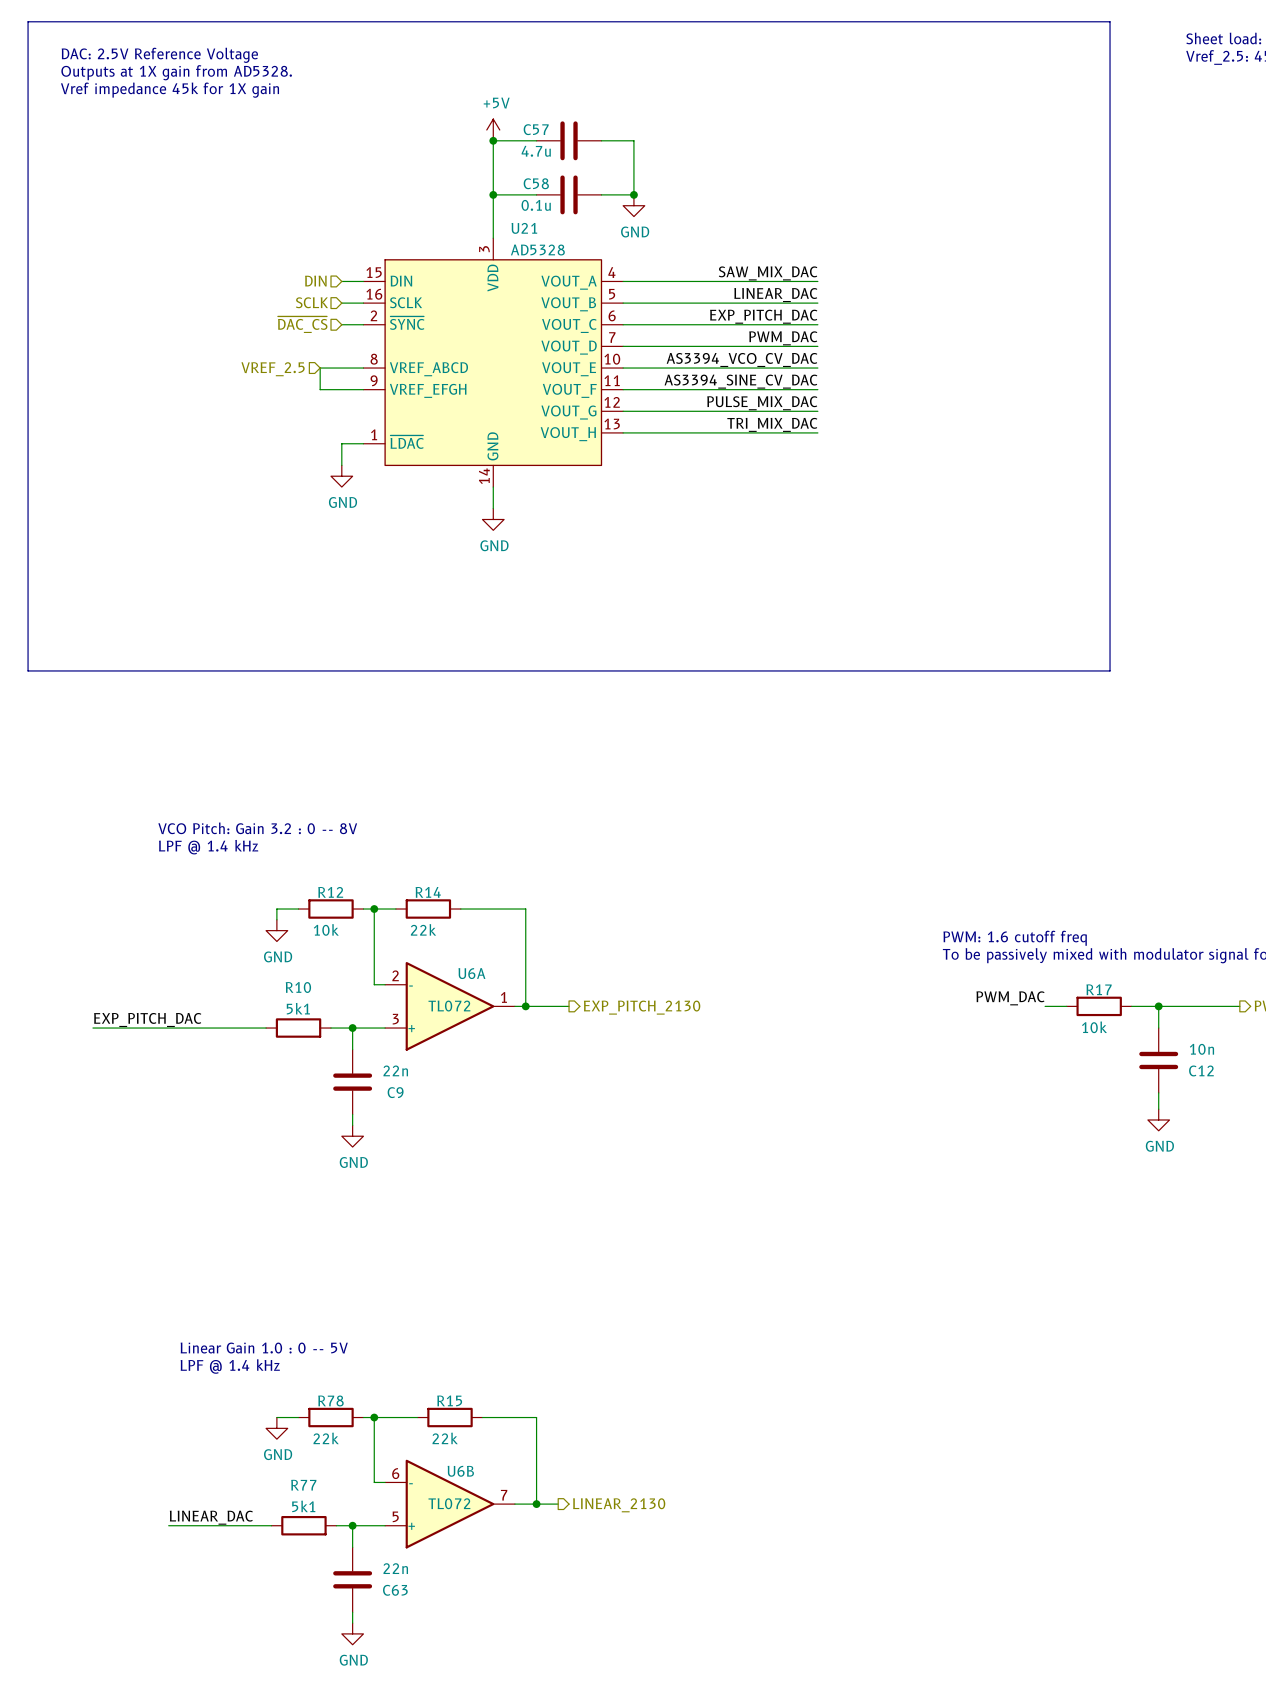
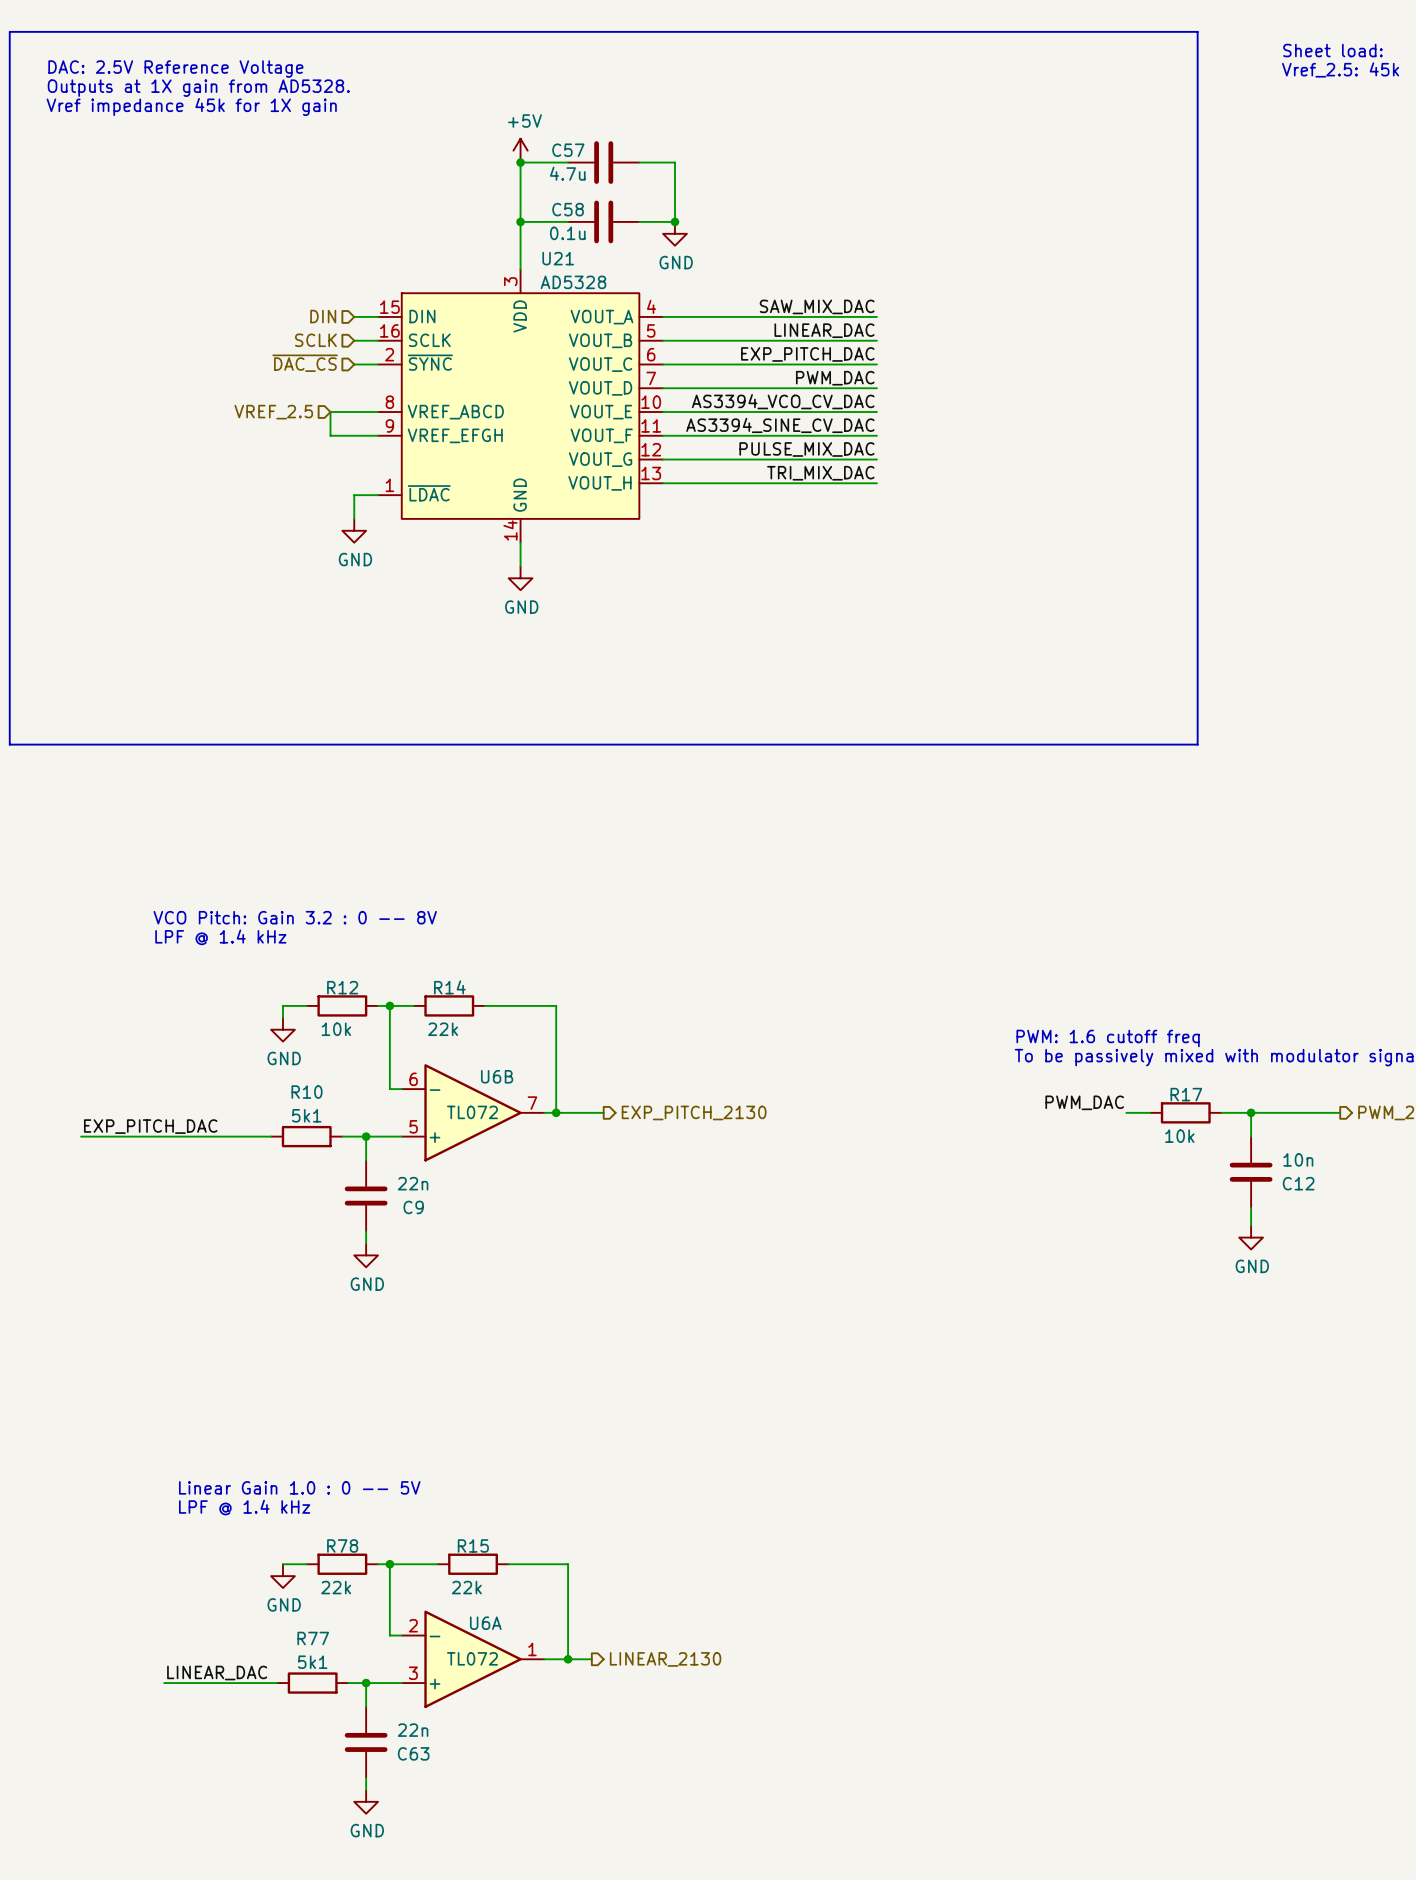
U6A name position: U6A (471, 973) -> U6A (485, 1623)
U6A position: (450, 1006) -> (473, 1659)
U6B name position: U6B (460, 1471) -> U6B (497, 1076)
U6B position: (450, 1504) -> (473, 1112)

